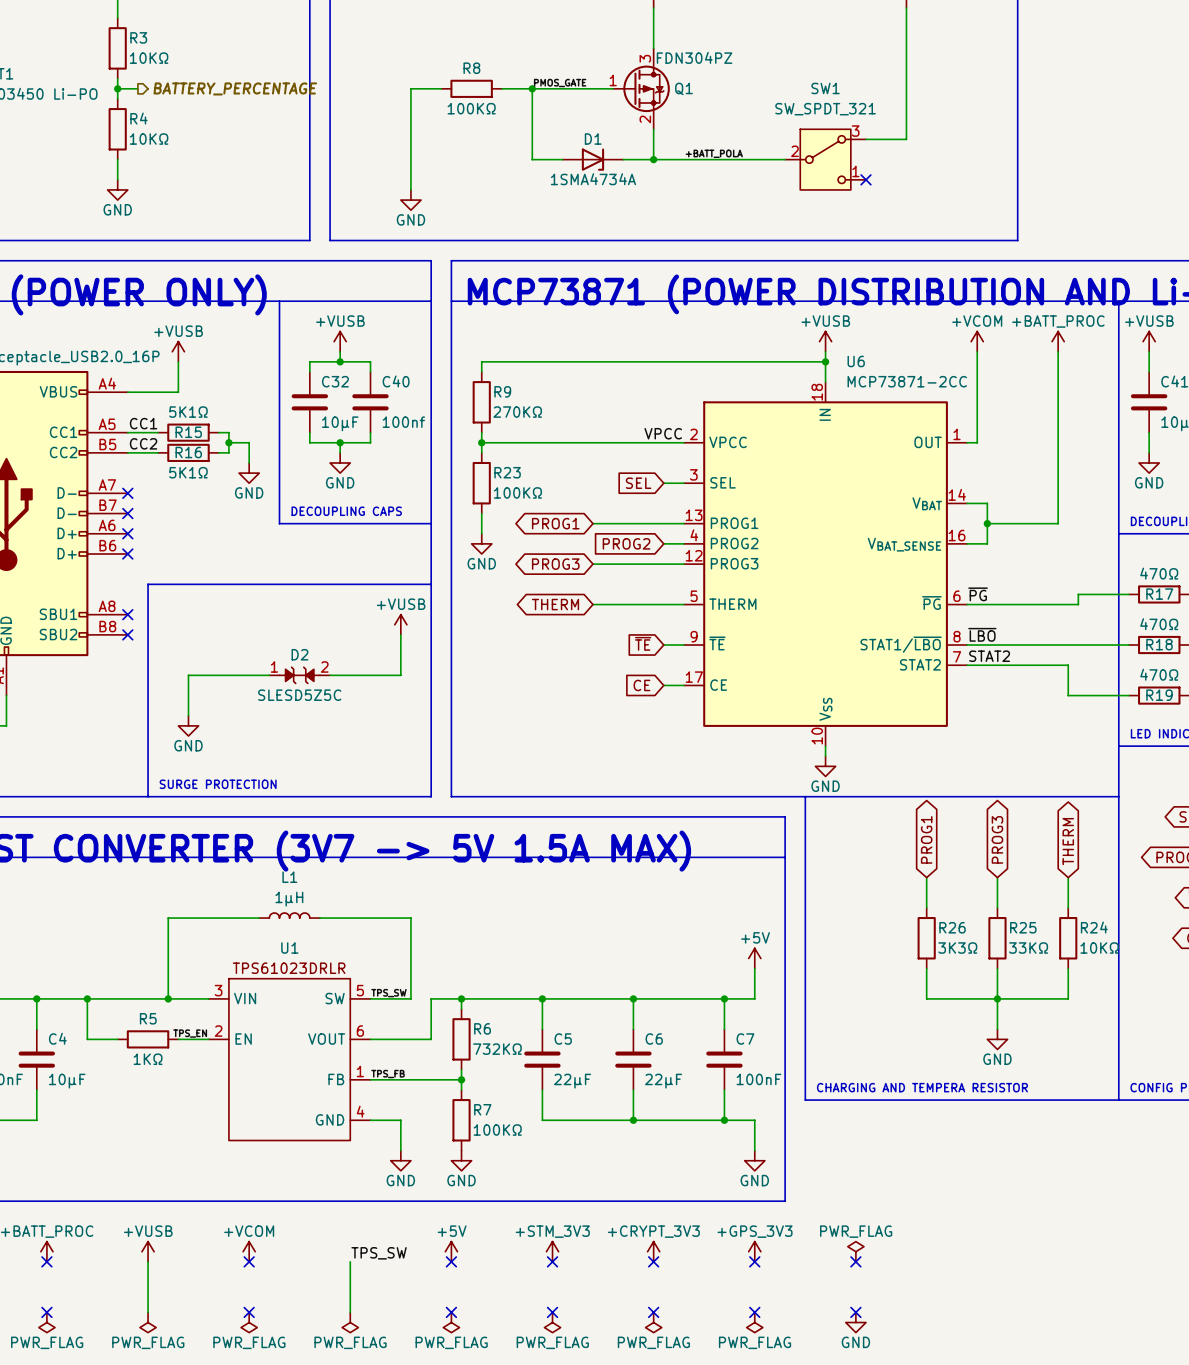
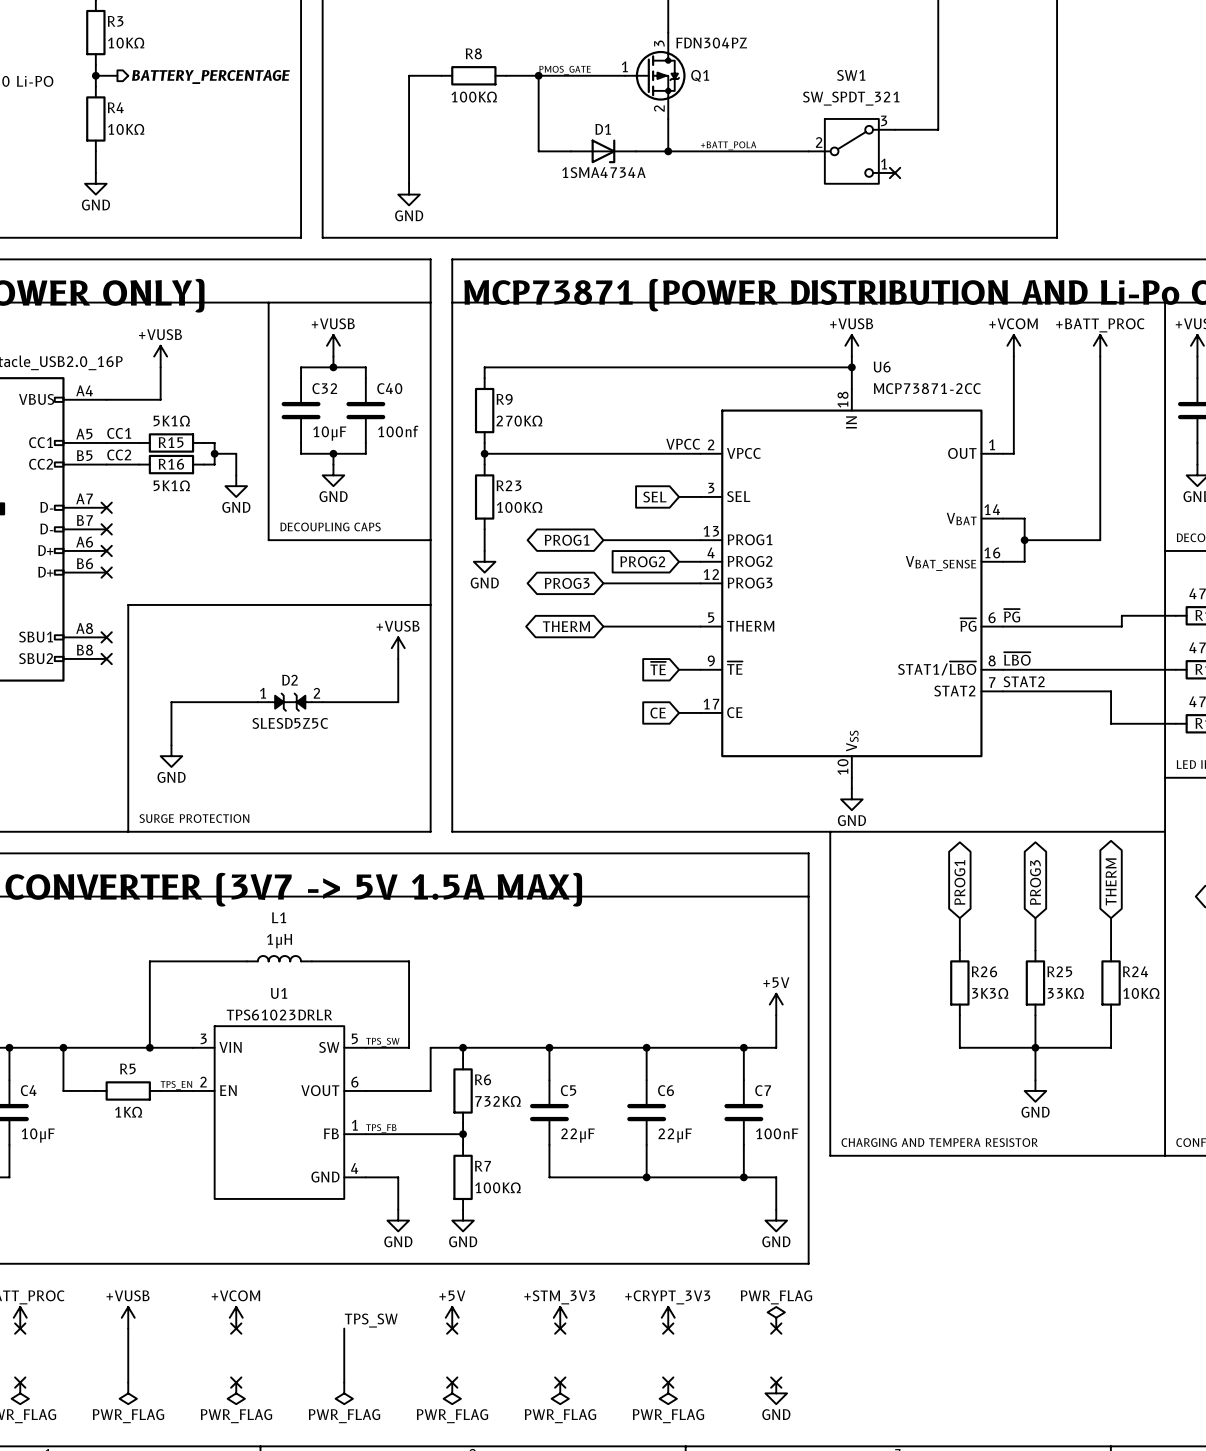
power symbol: +GPS_3V3 (754, 1251) -> PWR_FLAG (776, 1317)
power symbol: PWR_FLAG (855, 1251) -> none
no-connect mark: (855, 1261) -> none
no-connect mark: (855, 1312) -> none
power symbol: PWR_FLAG (754, 1322) -> GND (776, 1393)
power symbol: GND (855, 1322) -> none

